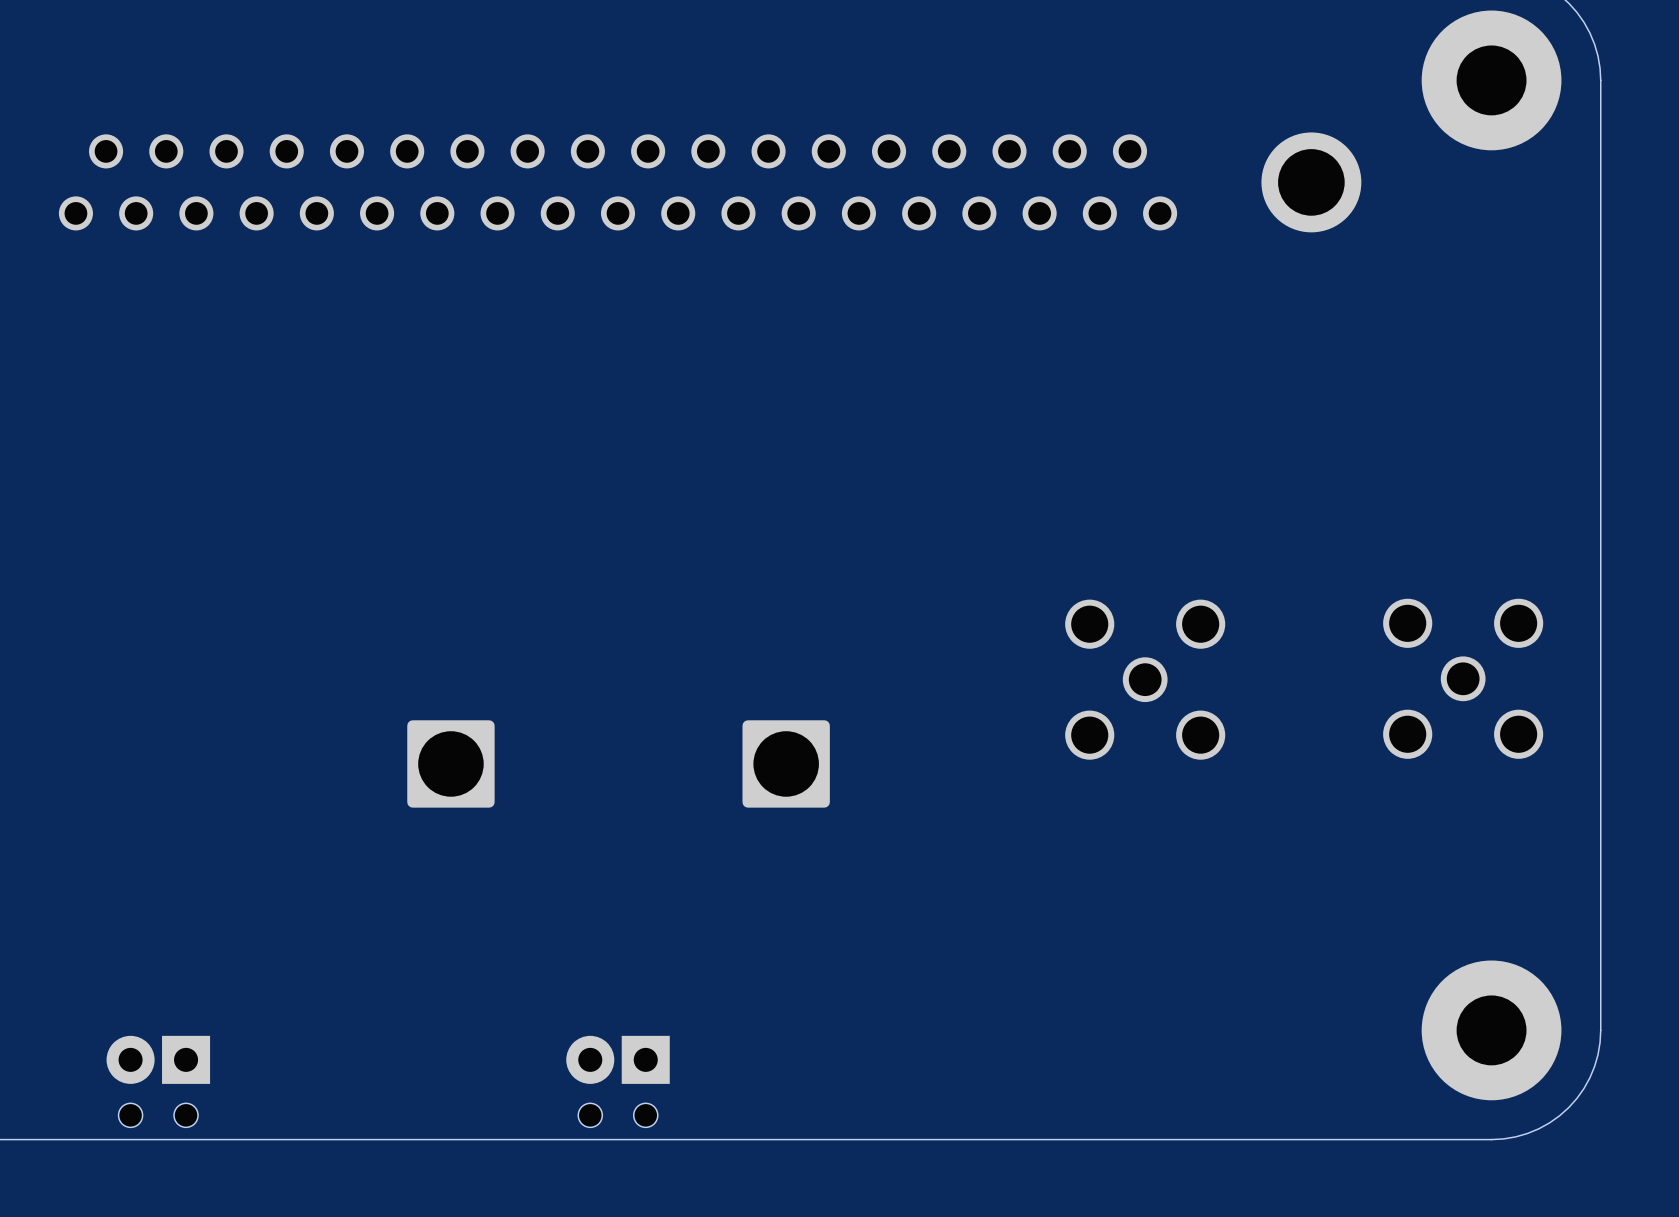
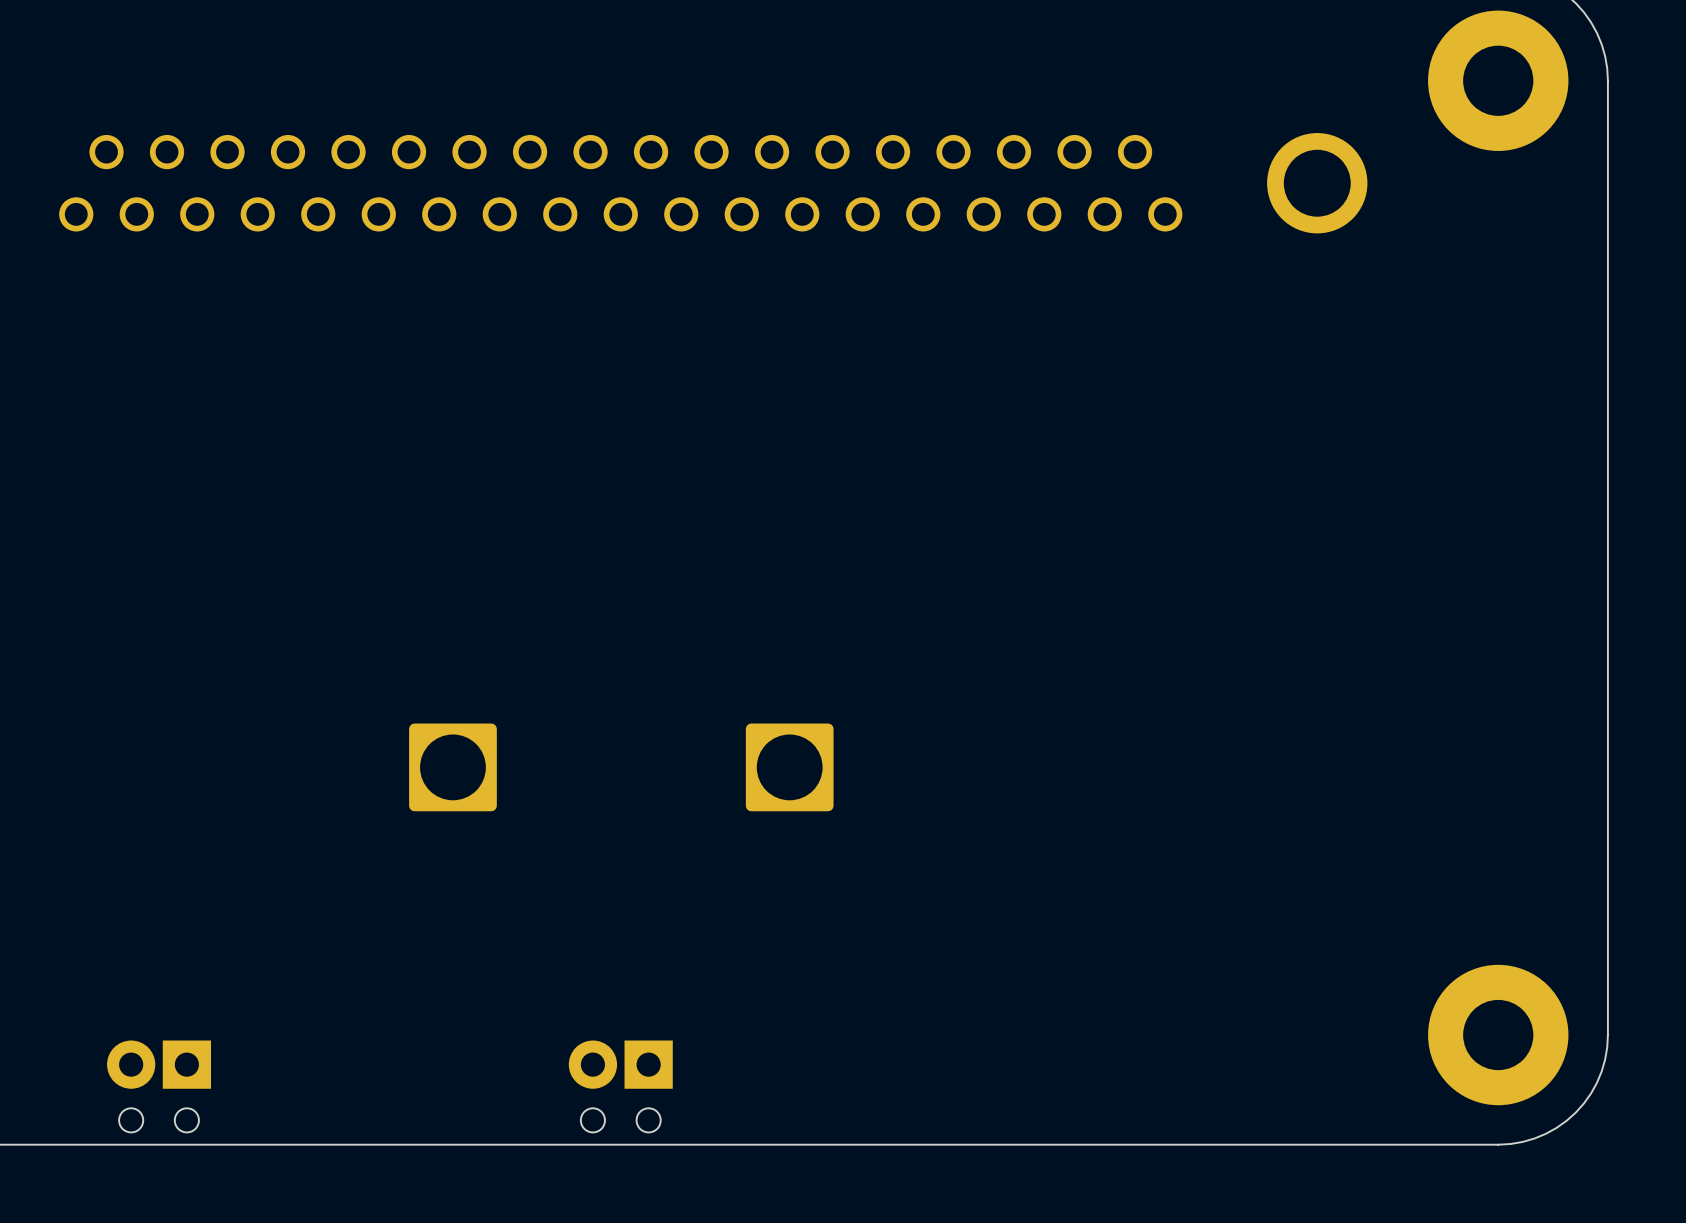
part: (1463, 678) -> none
part: (1145, 679) -> none

